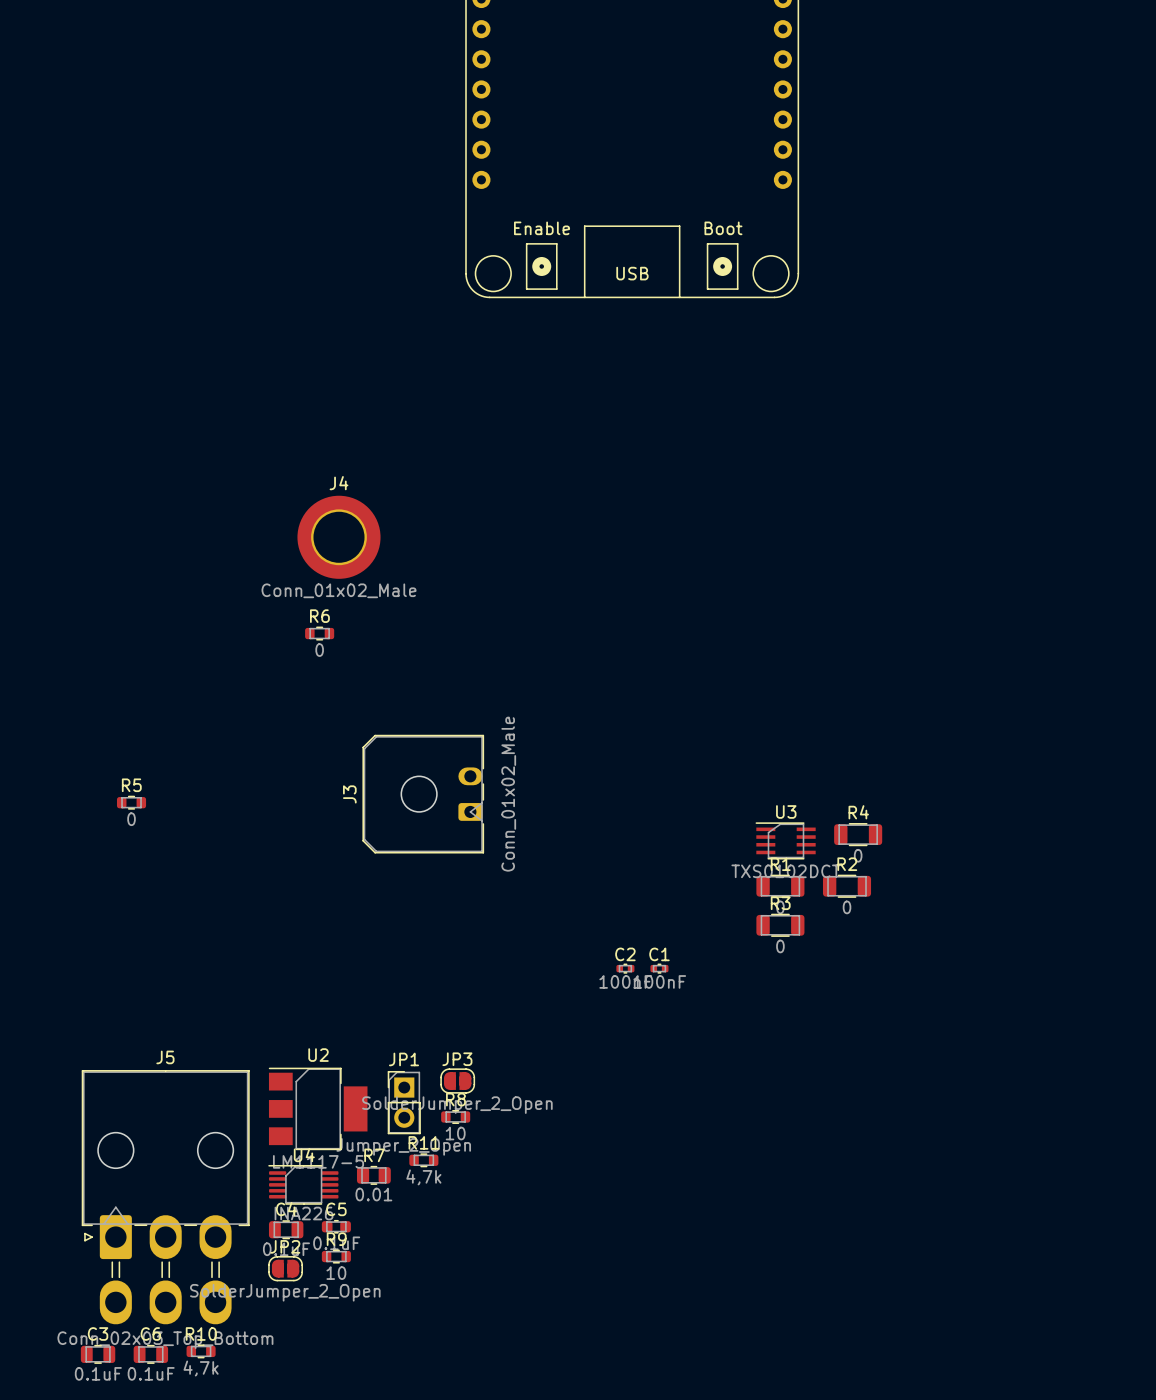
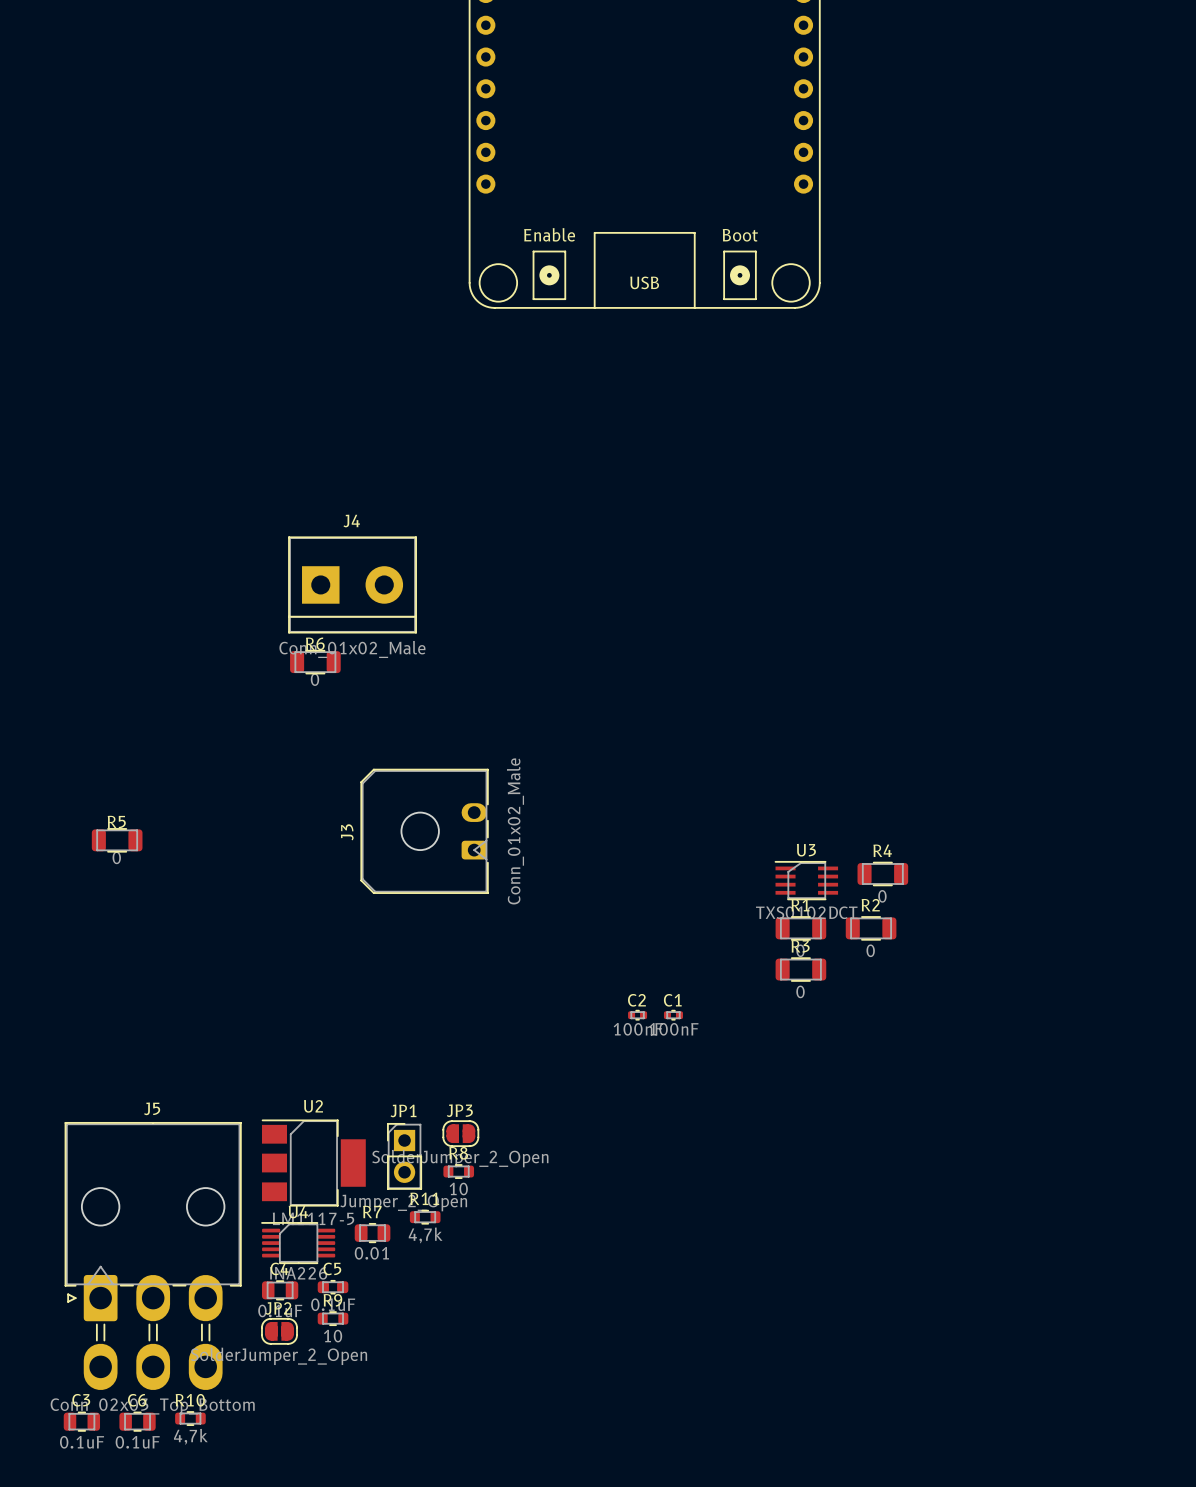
J4 footprint: [297, 495, 381, 579] -> [288, 536, 417, 634]
R6 footprint: [305, 626, 335, 641] -> [290, 649, 341, 675]
R5 footprint: [116, 795, 147, 810] -> [91, 828, 143, 853]

